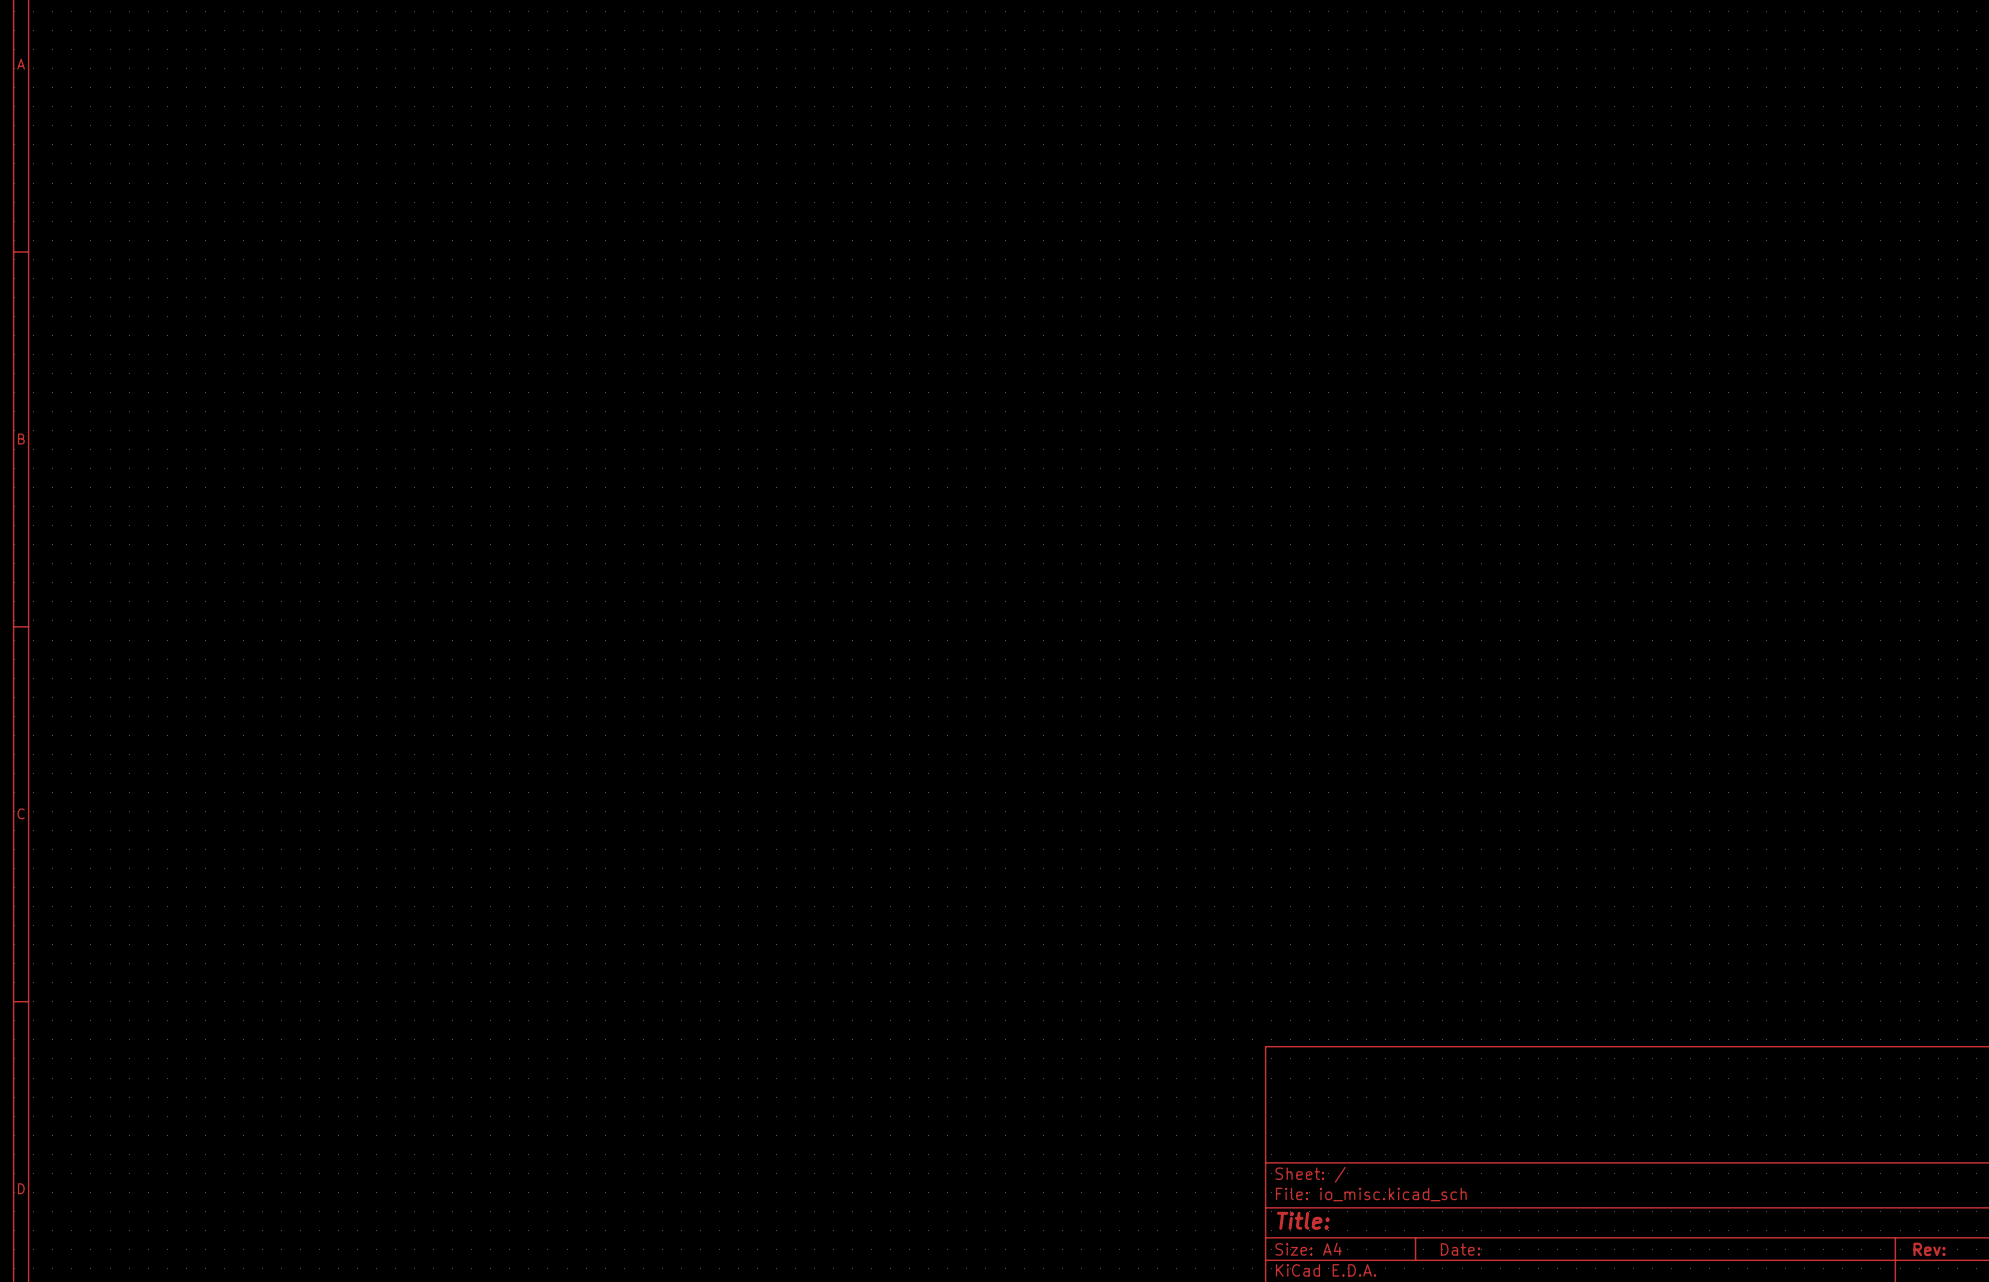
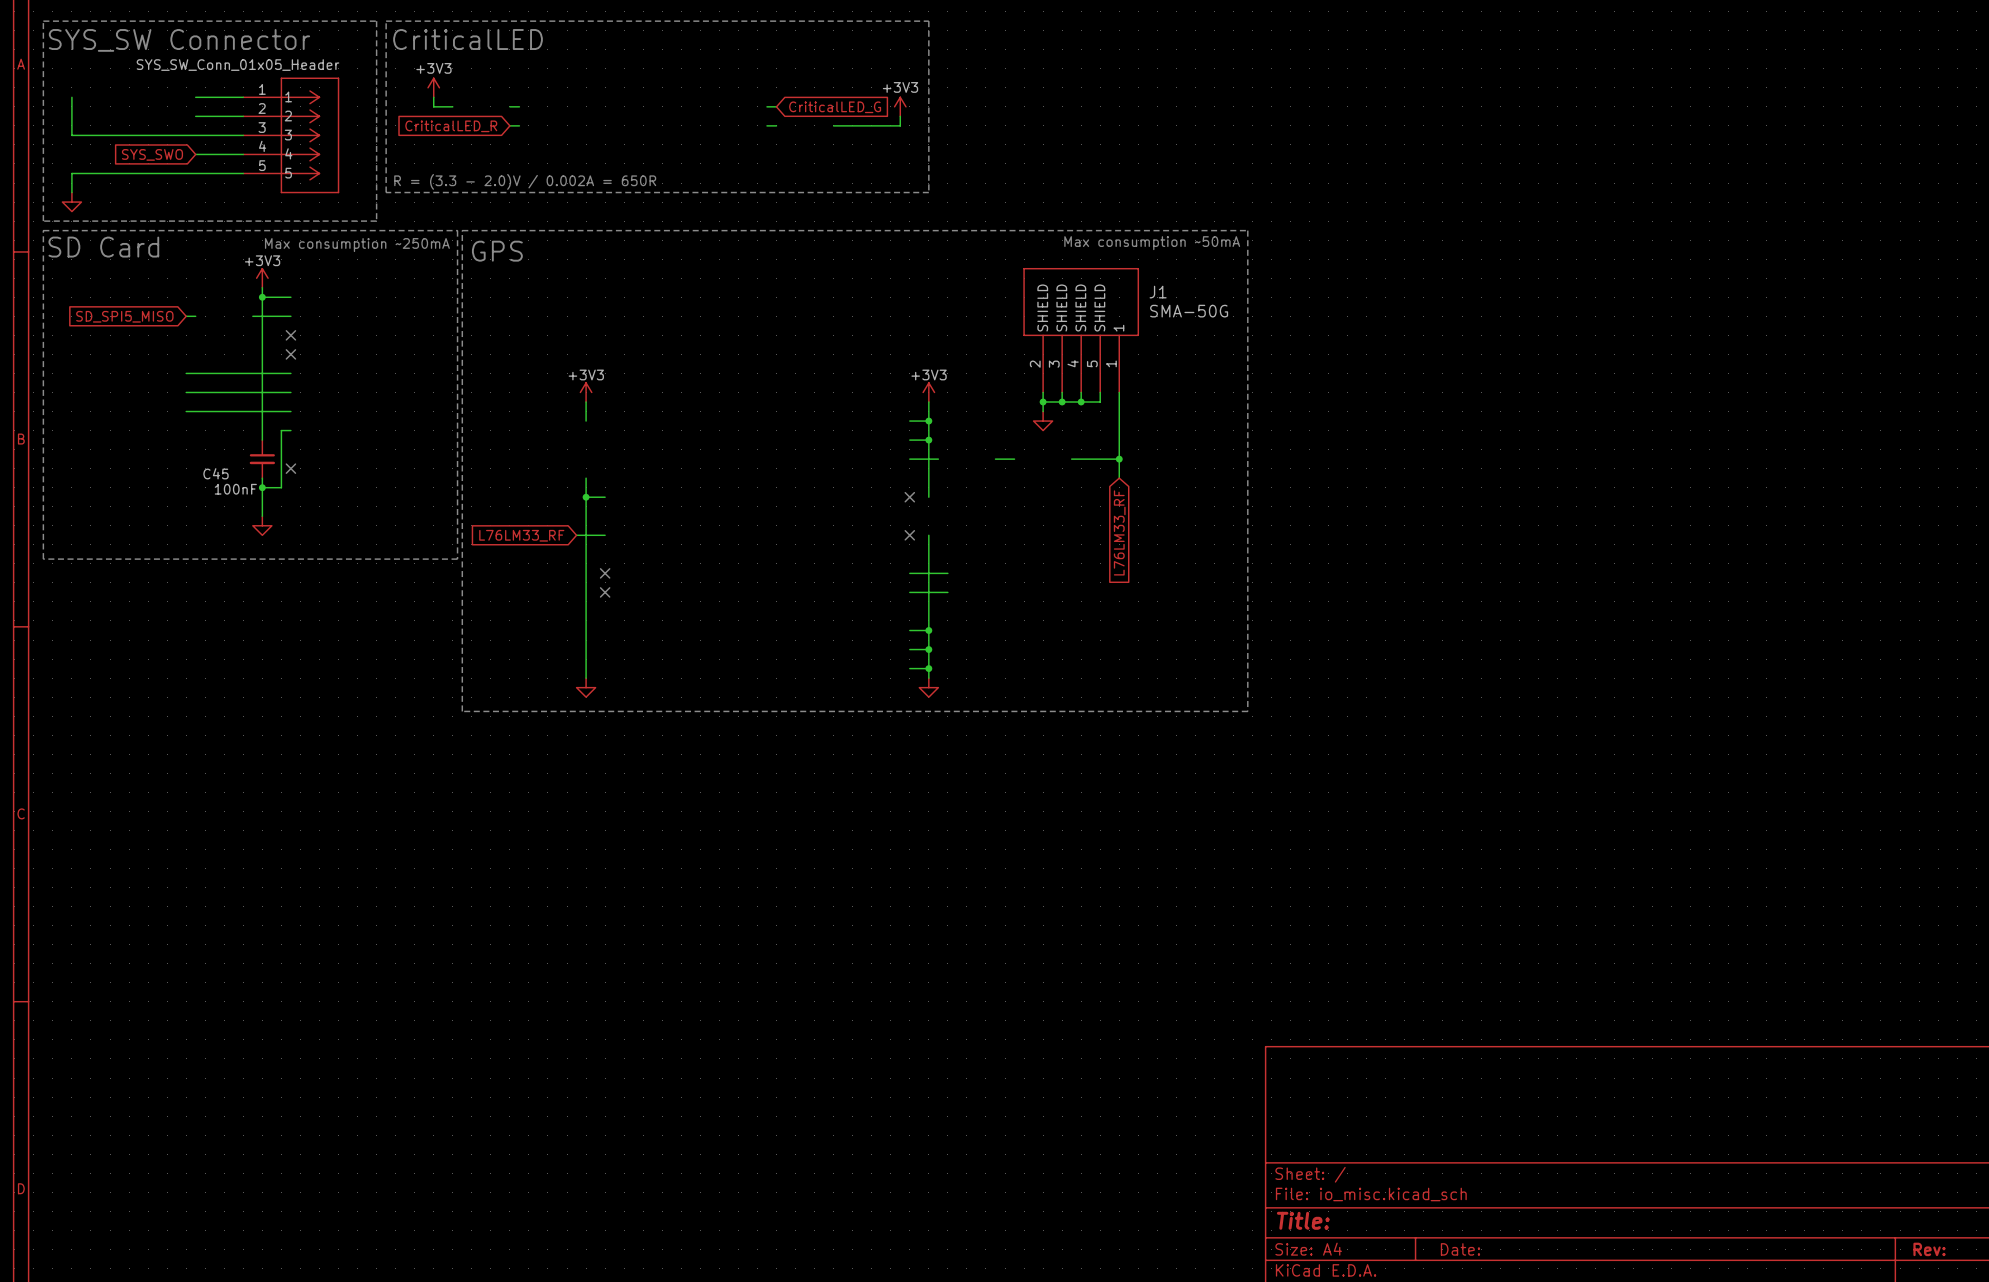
line: none -> (43, 21) (376, 21) (376, 221) (43, 221) (43, 21)
line: none -> (386, 21) (928, 21) (928, 192) (386, 192) (386, 21)
text: none -> CriticalLED (468, 39)
text: none -> SYS_SW Connector (179, 40)
power symbol: none -> +3V3 (433, 87)
wire: none -> (71, 97) (71, 135) (243, 135)
wire: none -> (195, 97) (243, 97)
wire: none -> (433, 97) (433, 106) (452, 106)
wire: none -> (509, 106) (519, 106)
wire: none -> (766, 106) (776, 106)
power symbol: none -> +3V3 (900, 106)
global label: none -> CriticalLED_G (835, 107)
wire: none -> (195, 116) (243, 116)
wire: none -> (900, 116) (900, 125) (833, 125)
wire: none -> (509, 125) (519, 125)
wire: none -> (766, 125) (776, 125)
global label: none -> CriticalLED_R (451, 126)
part: none -> SYS_SW_Conn_01x05_Header (291, 135)
global label: none -> SYS_SWO (152, 154)
wire: none -> (195, 154) (243, 154)
wire: none -> (243, 173) (71, 173) (71, 192)
text: none -> R = (3.3 - 2.0)V / 0.002A = 650R (525, 181)
power symbol: none -> (71, 202)
line: none -> (43, 230) (43, 559) (457, 559) (457, 230) (43, 230)
line: none -> (462, 230) (1247, 230) (1247, 711) (462, 711) (462, 230)
text: none -> Max consumption ~50mA (1152, 243)
text: none -> Max consumption ~250mA (357, 245)
text: none -> SD Card (103, 247)
text: none -> GPS (497, 251)
power symbol: none -> +3V3 (262, 278)
wire: none -> (262, 287) (262, 440)
wire: none -> (262, 297) (290, 297)
junction: none -> (262, 297)
global label: none -> SD_SPI5_MISO (124, 316)
wire: none -> (186, 316) (195, 316)
wire: none -> (252, 316) (290, 316)
J1: none -> SMA-50G (1081, 330)
no-connect mark: none -> (290, 335)
no-connect mark: none -> (290, 354)
wire: none -> (186, 373) (290, 373)
wire: none -> (186, 392) (290, 392)
power symbol: none -> +3V3 (586, 392)
power symbol: none -> +3V3 (928, 392)
wire: none -> (1043, 392) (1043, 411)
wire: none -> (1062, 392) (1062, 402)
wire: none -> (1081, 392) (1081, 402)
wire: none -> (1100, 392) (1100, 402) (1043, 402)
wire: none -> (1119, 392) (1119, 478)
wire: none -> (586, 402) (586, 421)
wire: none -> (928, 402) (928, 497)
junction: none -> (1043, 402)
junction: none -> (1062, 402)
junction: none -> (1081, 402)
wire: none -> (186, 411) (290, 411)
wire: none -> (909, 421) (928, 421)
junction: none -> (928, 421)
power symbol: none -> (1043, 421)
wire: none -> (290, 430) (281, 430) (281, 487) (262, 487)
wire: none -> (909, 440) (928, 440)
junction: none -> (928, 440)
C45: none -> 100nF (262, 459)
wire: none -> (909, 459) (938, 459)
wire: none -> (995, 459) (1014, 459)
wire: none -> (1071, 459) (1119, 459)
junction: none -> (1119, 459)
no-connect mark: none -> (290, 468)
wire: none -> (262, 478) (262, 516)
wire: none -> (586, 478) (586, 678)
junction: none -> (262, 487)
wire: none -> (586, 497) (605, 497)
junction: none -> (586, 497)
no-connect mark: none -> (909, 497)
power symbol: none -> (262, 525)
global label: none -> L76LM33_RF (1119, 532)
global label: none -> L76LM33_RF (521, 535)
wire: none -> (576, 535) (605, 535)
no-connect mark: none -> (909, 535)
wire: none -> (928, 535) (928, 678)
no-connect mark: none -> (605, 573)
wire: none -> (909, 573) (947, 573)
no-connect mark: none -> (605, 592)
wire: none -> (909, 592) (947, 592)
wire: none -> (909, 630) (928, 630)
junction: none -> (928, 630)
wire: none -> (909, 649) (928, 649)
junction: none -> (928, 649)
wire: none -> (909, 668) (928, 668)
junction: none -> (928, 668)
power symbol: none -> (586, 687)
power symbol: none -> (928, 687)

